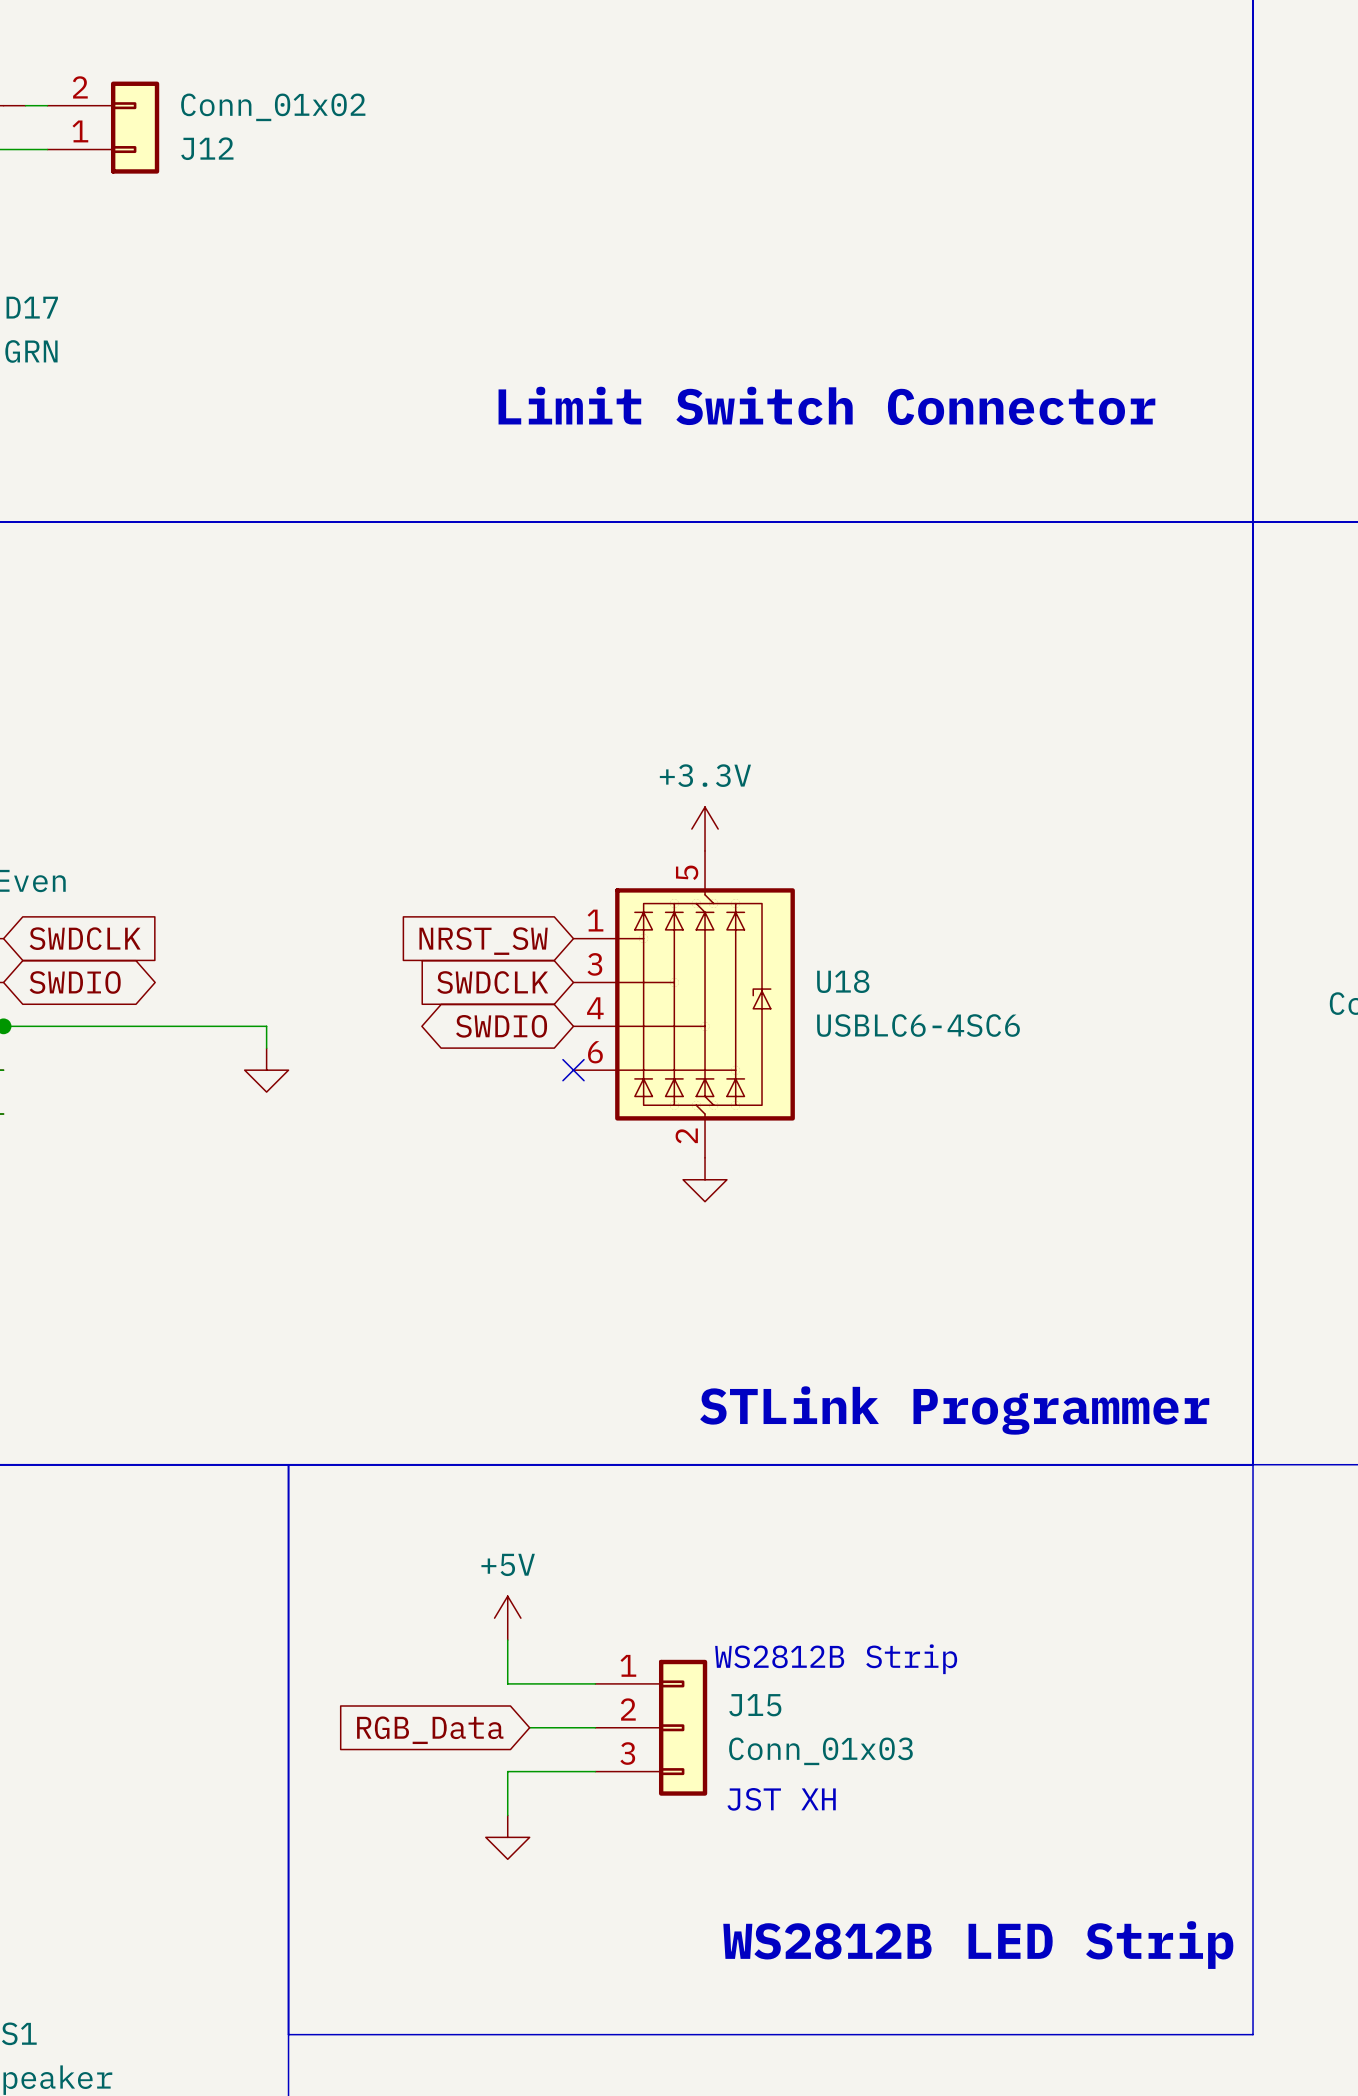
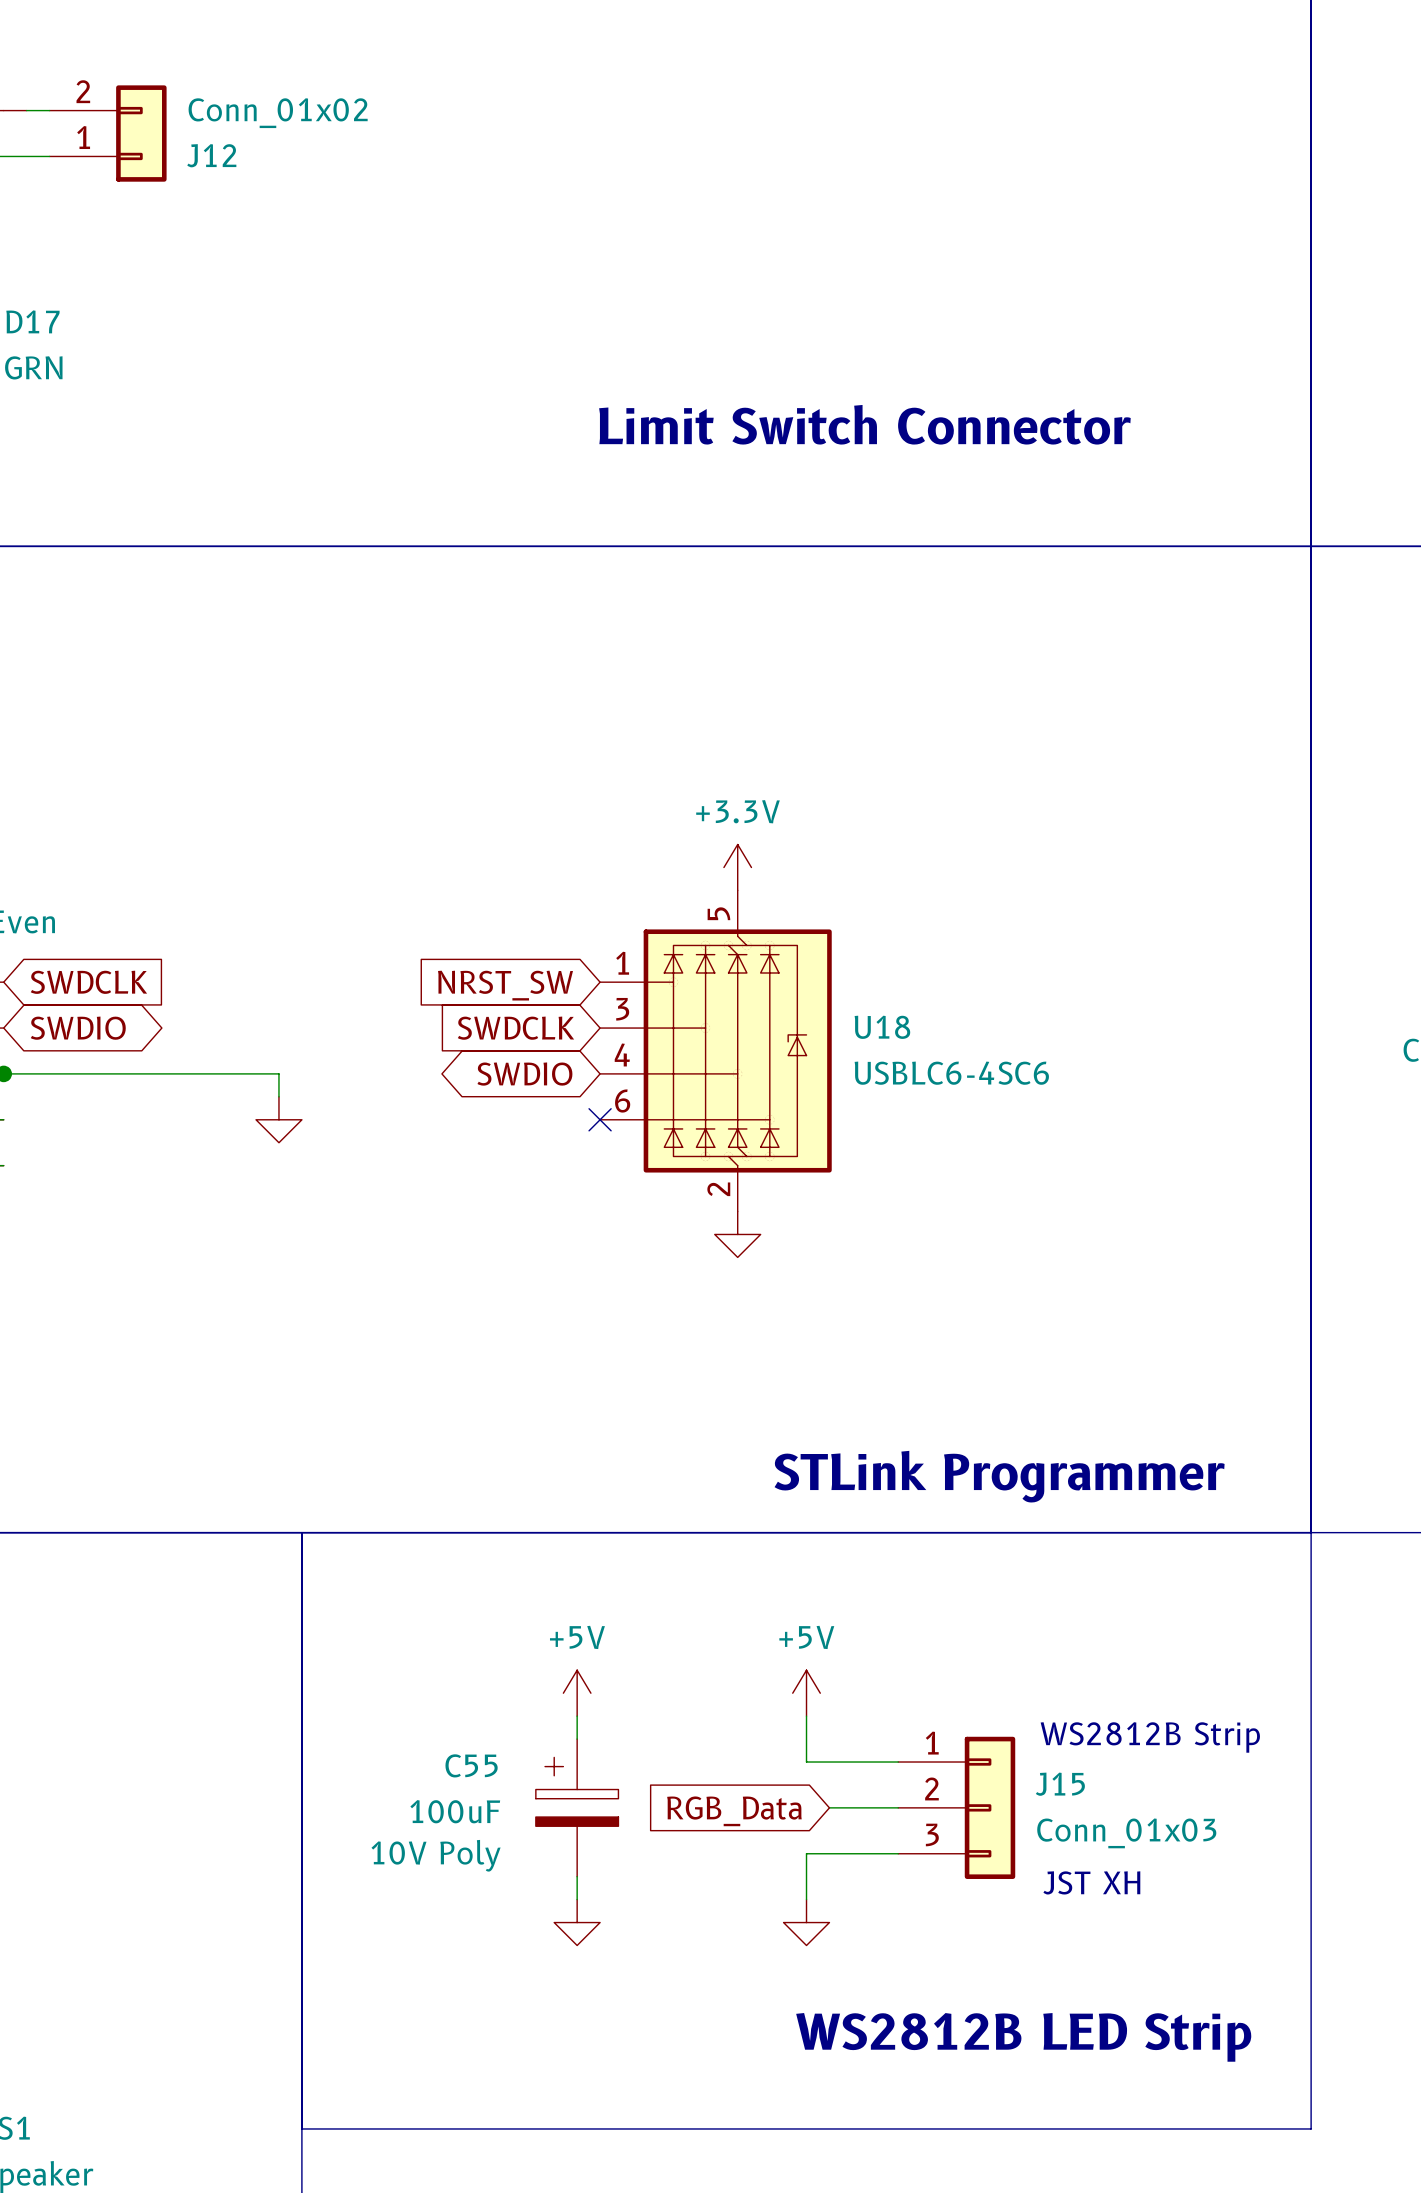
power symbol position: +5V (507, 1618) -> +5V (577, 1693)
power symbol: none -> +5V (806, 1693)
wire: (507, 1640) (507, 1683) (595, 1683) -> (806, 1716) (806, 1762) (898, 1762)
wire: none -> (577, 1716) (577, 1739)
text position: WS2812B Strip (836, 1659) -> WS2812B Strip (1150, 1737)
wire: (529, 1727) (595, 1727) -> (829, 1807) (898, 1807)
C55: none -> 100uF (577, 1807)
J15 position: (651, 1727) -> (956, 1807)
global label position: RGB_Data (430, 1730) -> RGB_Data (734, 1811)
wire: (595, 1771) (507, 1771) (507, 1815) -> (898, 1853) (806, 1853) (806, 1899)
wire: none -> (577, 1876) (577, 1899)
text position: JST XH (781, 1799) -> JST XH (1091, 1882)
power symbol position: (507, 1837) -> (577, 1922)
power symbol: none -> (806, 1922)

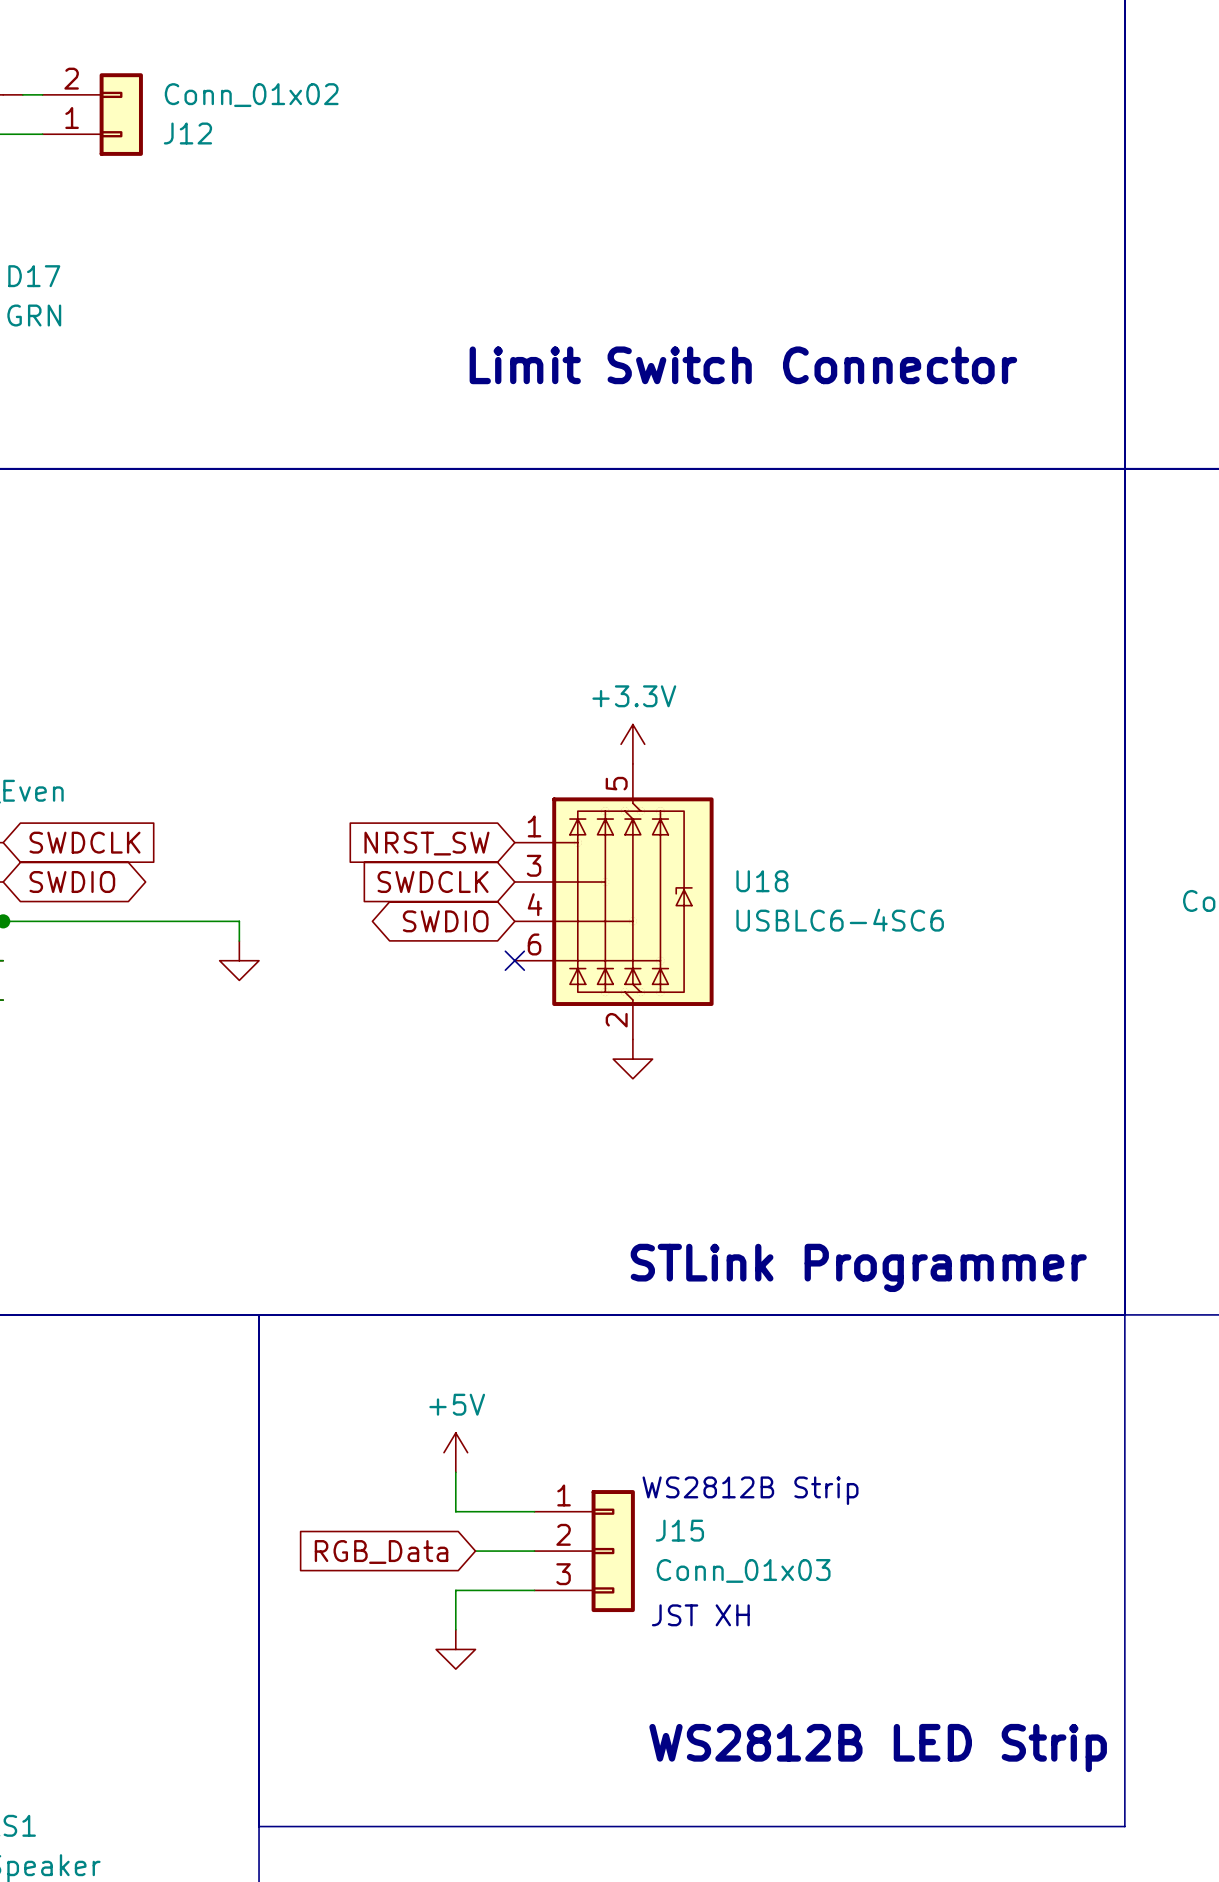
power symbol position: +5V (577, 1693) -> +5V (455, 1452)
power symbol: +5V (806, 1693) -> none
wire: (577, 1716) (577, 1739) -> none
wire: (806, 1716) (806, 1762) (898, 1762) -> (455, 1472) (455, 1511) (534, 1511)
text position: WS2812B Strip (1150, 1737) -> WS2812B Strip (750, 1490)
C55: 100uF (577, 1807) -> none
wire: (829, 1807) (898, 1807) -> (475, 1551) (534, 1551)
J15 position: (956, 1807) -> (584, 1551)
global label position: RGB_Data (734, 1811) -> RGB_Data (381, 1552)
wire: (898, 1853) (806, 1853) (806, 1899) -> (534, 1590) (455, 1590) (455, 1629)
wire: (577, 1876) (577, 1899) -> none
text position: JST XH (1091, 1882) -> JST XH (700, 1615)
power symbol position: (577, 1922) -> (455, 1649)
power symbol: (806, 1922) -> none

